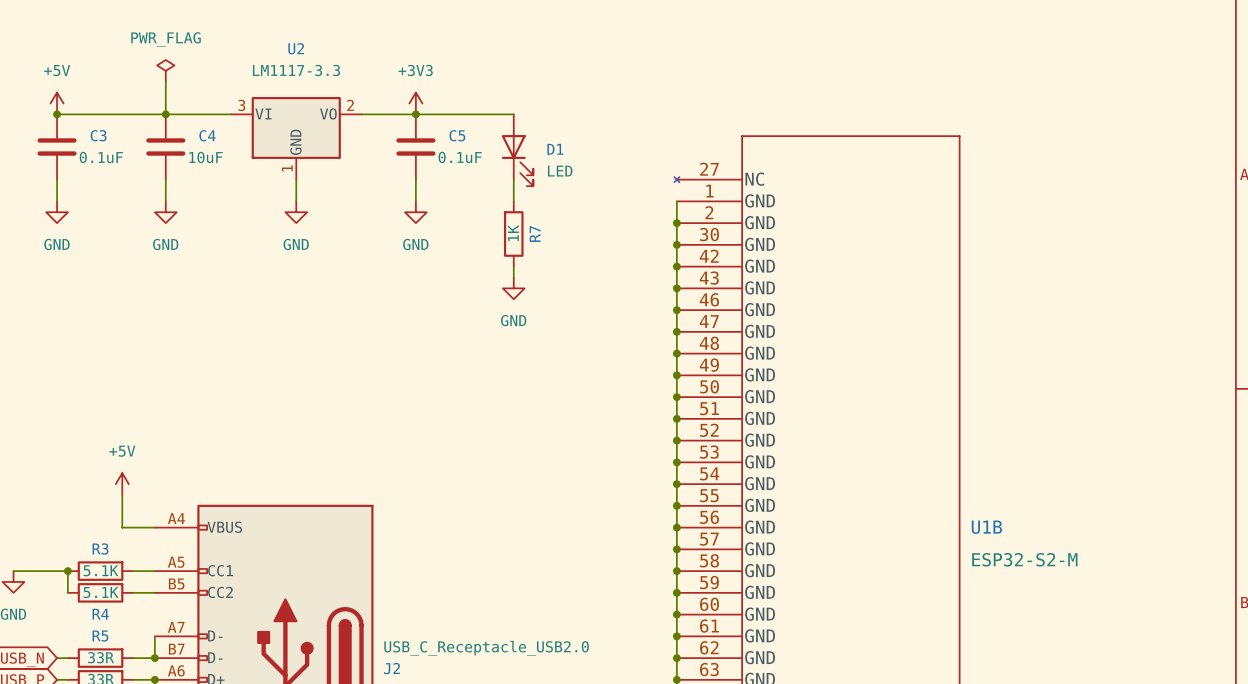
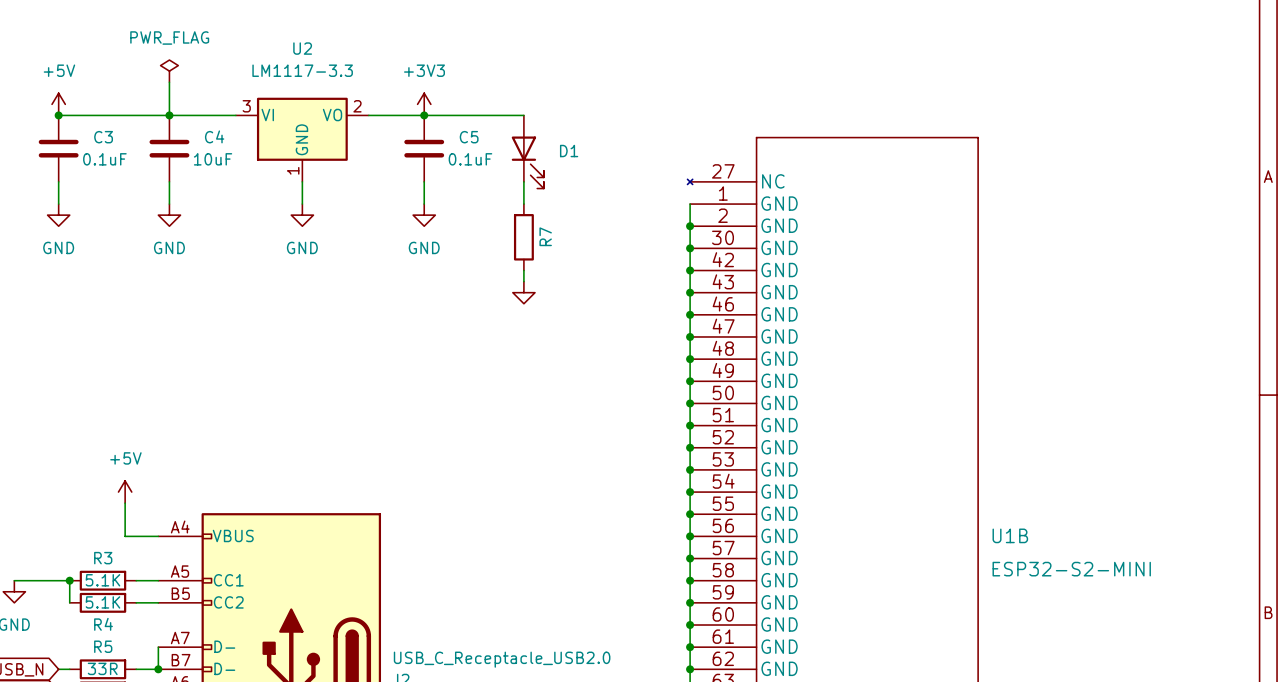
D1 value: LED (560, 171) -> none
R7 value: 1K (513, 233) -> none
power symbol text: GND (513, 320) -> none
U1B value: ESP32-S2-M (1024, 559) -> ESP32-S2-MINI (1071, 569)

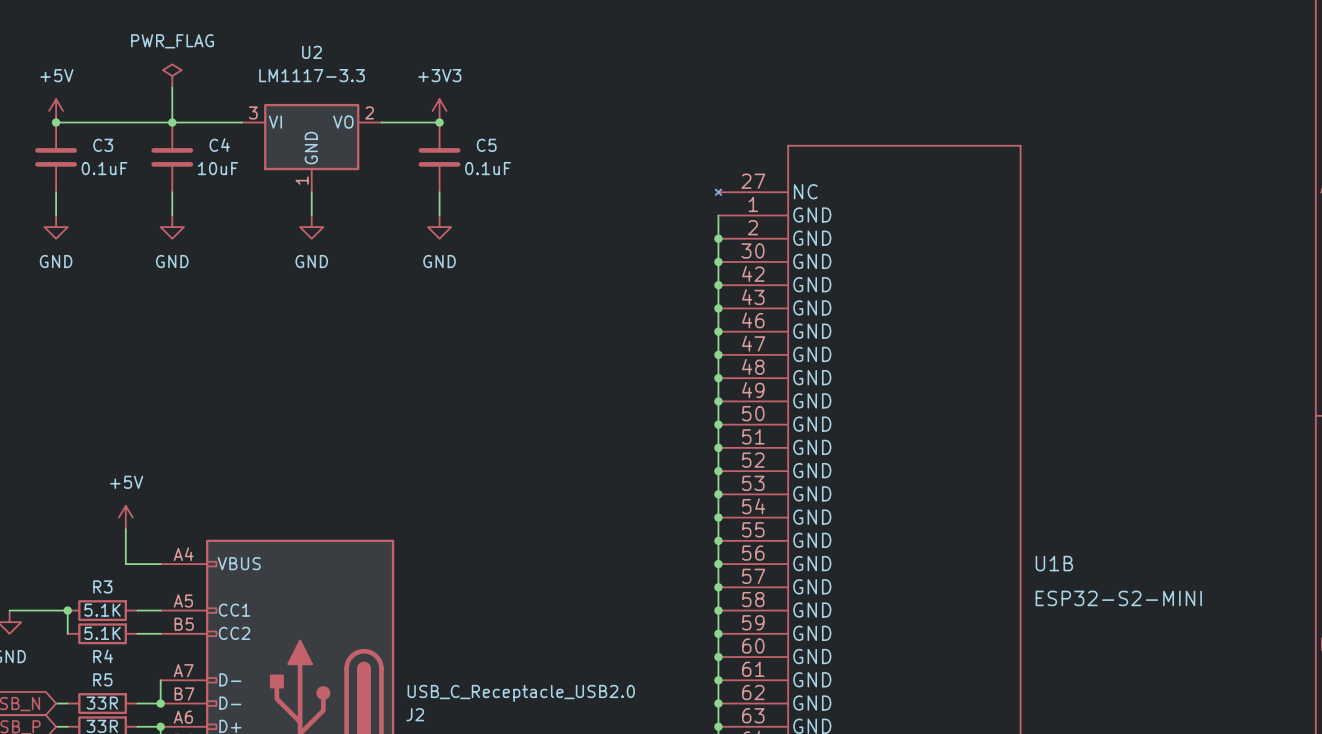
wire: (424, 115) (523, 115) -> none
D1: (527, 151) -> none
wire: (523, 181) (523, 204) -> none
R7: (523, 237) -> none
wire: (523, 270) (523, 281) -> none
power symbol: (523, 292) -> none

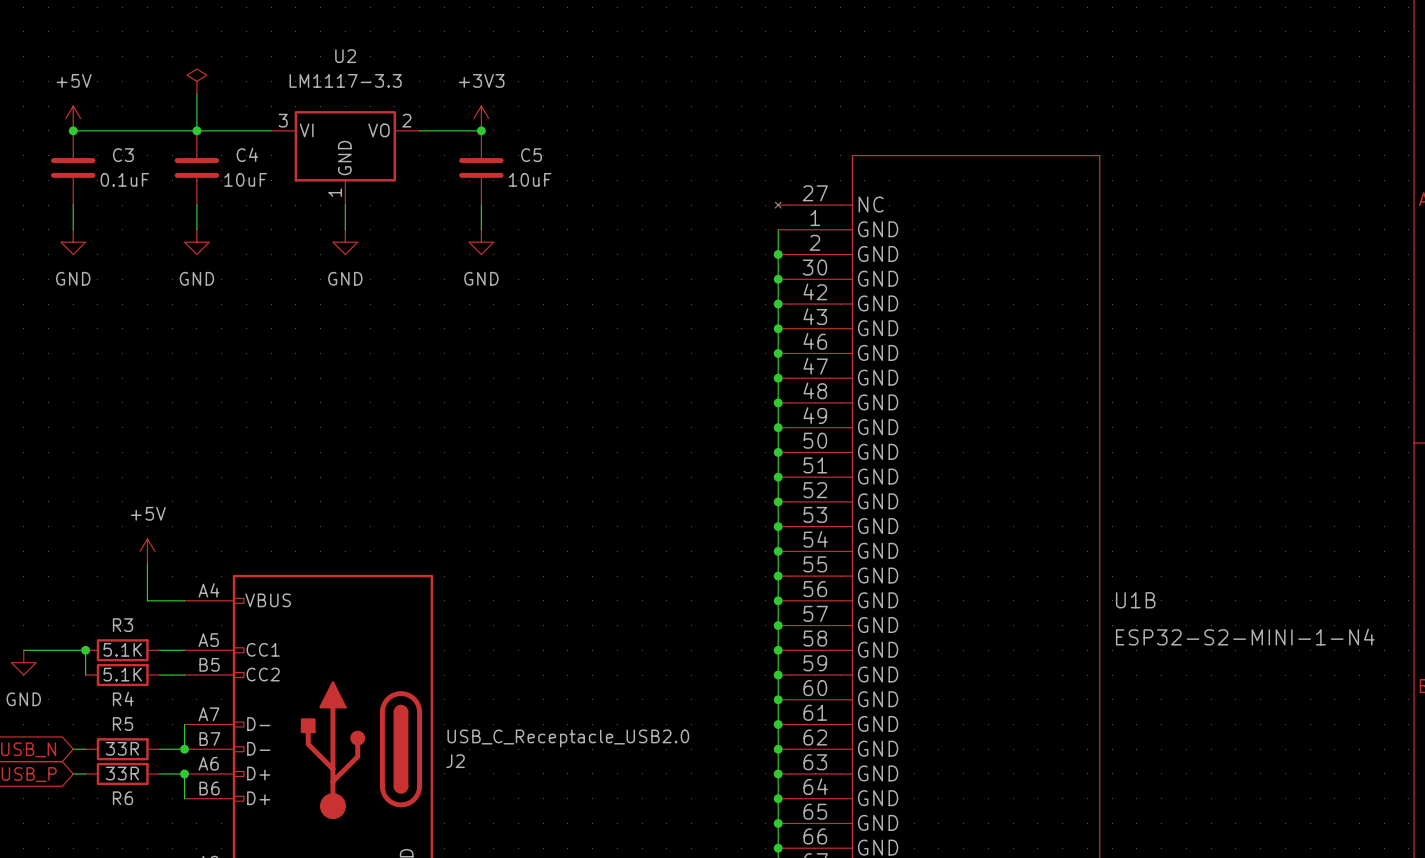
power symbol text: PWR_FLAG (172, 41) -> none
C5 value: 0.1uF (488, 168) -> 10uF (530, 179)
U1B value: ESP32-S2-MINI (1118, 598) -> ESP32-S2-MINI-1-N4 (1245, 637)

